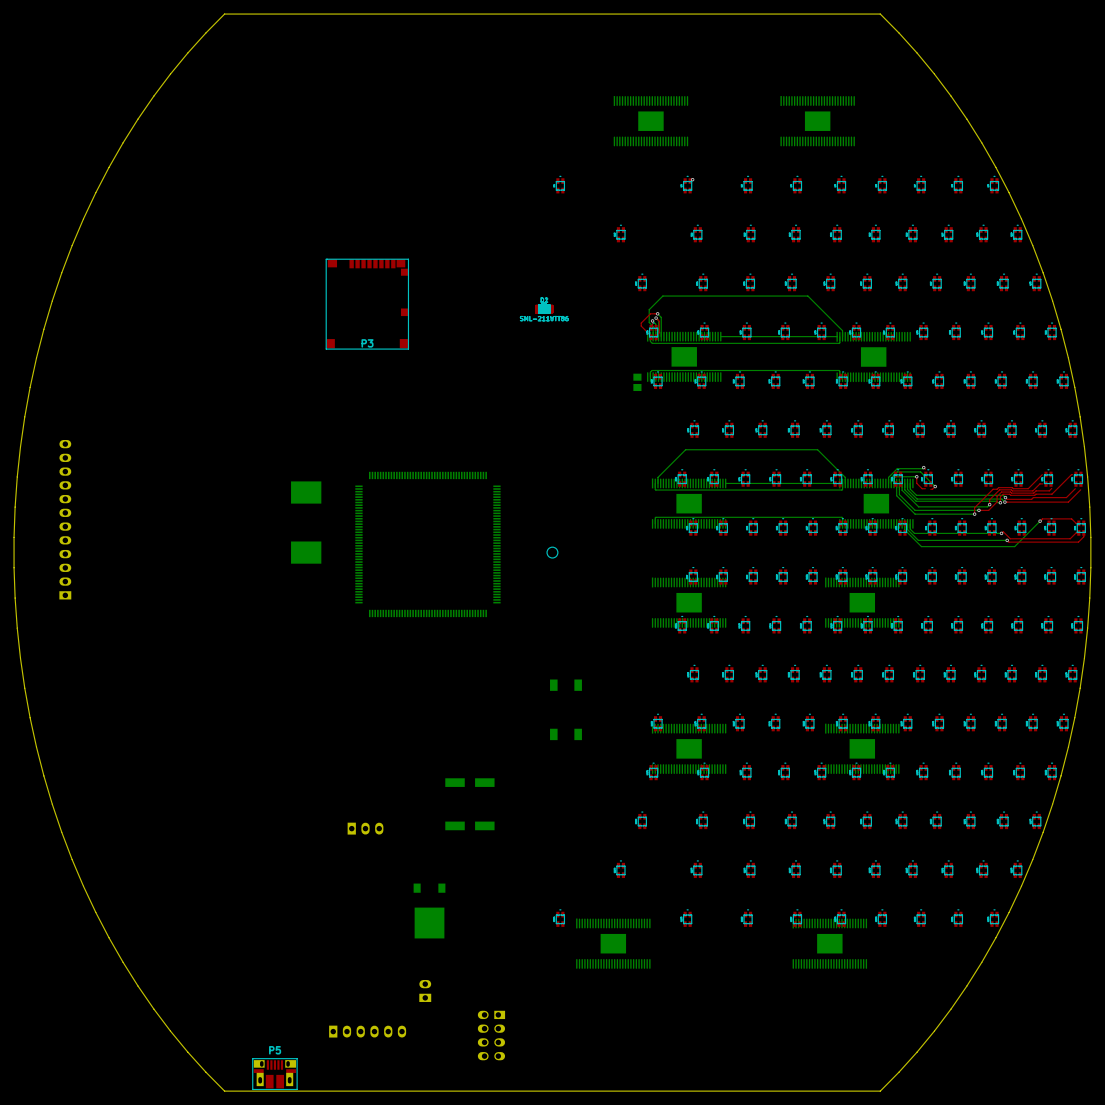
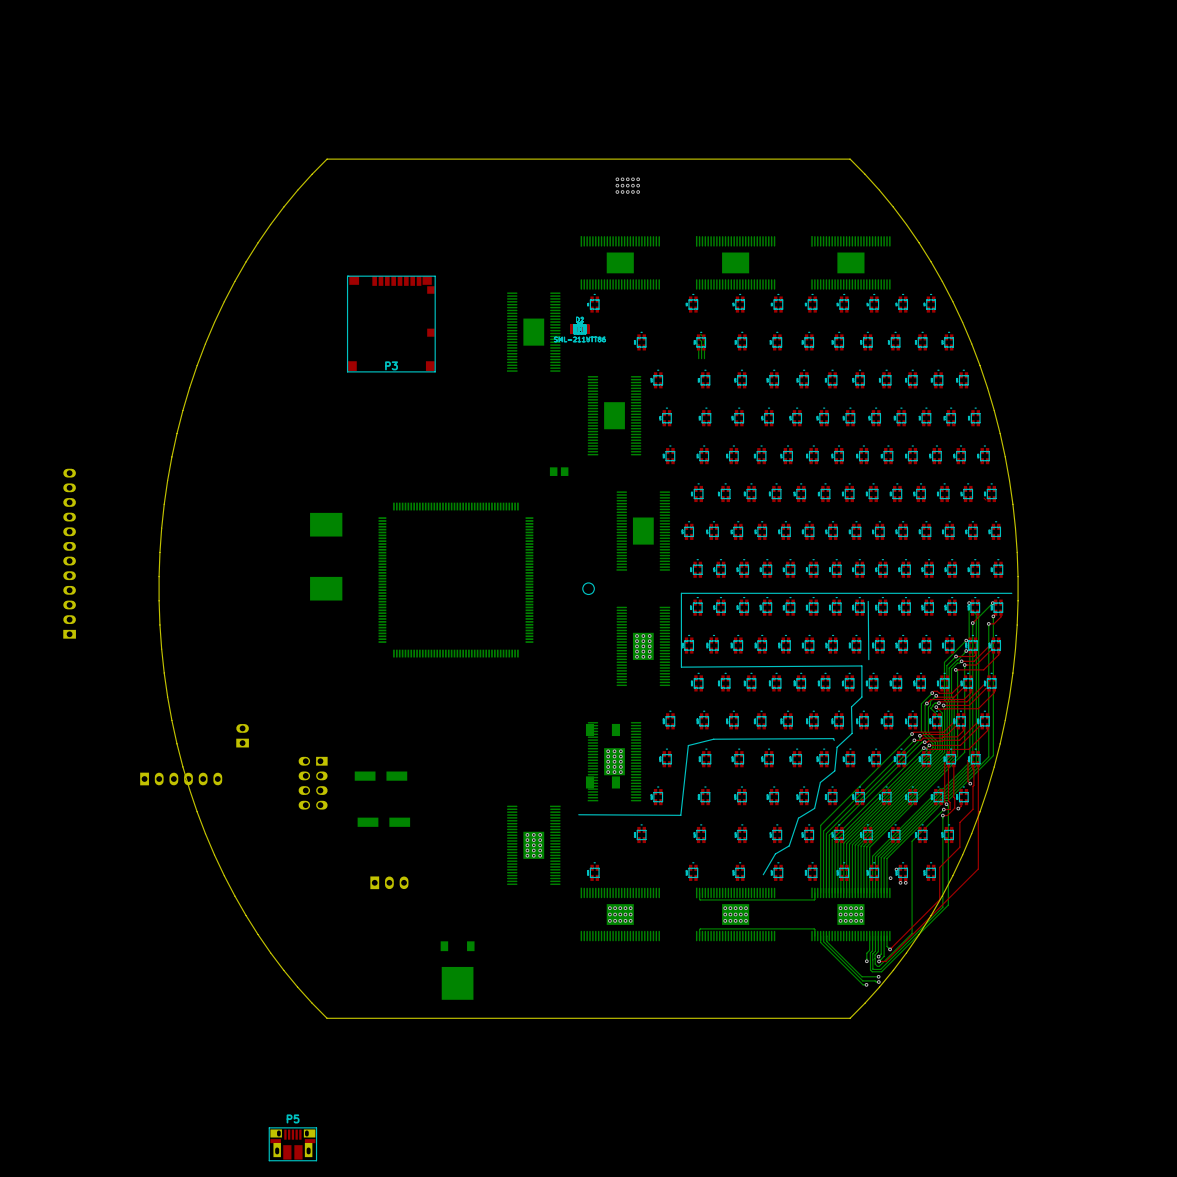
board edge: (224, 14) (187, 53) (153, 96) (109, 167) (83, 218) (61, 272) (36, 358) (24, 416) (17, 476) (14, 537) (15, 598) (20, 658) (30, 717) (43, 775) (61, 832) (95, 912) (123, 962) (170, 1031) (224, 1091) (880, 1091) (917, 1052) (951, 1009) (995, 937) (1021, 886) (1043, 832) (1068, 747) (1080, 688) (1087, 628) (1090, 567) (1089, 507) (1084, 446) (1074, 387) (1061, 329) (1043, 272) (1009, 192) (981, 142) (934, 74) (880, 14) (224, 14) -> (327, 159) (297, 190) (270, 224) (246, 261) (224, 301) (205, 343) (182, 410) (171, 456) (164, 504) (159, 552) (159, 600) (164, 673) (171, 720) (182, 766) (205, 833) (224, 875) (246, 915) (283, 970) (327, 1018) (850, 1018) (879, 987) (906, 952) (931, 915) (952, 875) (971, 833) (994, 766) (1005, 720) (1012, 673) (1017, 624) (1018, 576) (1012, 504) (1005, 456) (994, 410) (971, 343) (952, 301) (931, 261) (893, 207) (850, 159) (327, 159)
part: (650, 121) -> none
part: (817, 121) -> none
via: none -> (617, 179)
via: none -> (622, 179)
via: none -> (627, 179)
via: none -> (632, 179)
via: none -> (638, 179)
via: none -> (617, 185)
via: none -> (622, 185)
via: none -> (627, 185)
via: none -> (632, 185)
via: none -> (638, 185)
via: (692, 179) -> none
via: none -> (617, 191)
via: none -> (622, 191)
via: none -> (627, 191)
via: none -> (632, 191)
via: none -> (638, 191)
part position: (560, 184) -> (594, 303)
part position: (687, 184) -> (693, 303)
part position: (748, 184) -> (740, 303)
part position: (797, 184) -> (778, 303)
part position: (841, 184) -> (812, 303)
part position: (882, 184) -> (844, 303)
part position: (921, 184) -> (874, 303)
part position: (958, 184) -> (903, 303)
part position: (994, 184) -> (931, 303)
part position: (620, 233) -> (641, 341)
part position: (697, 233) -> (701, 341)
part position: (750, 233) -> (742, 341)
part position: (796, 233) -> (777, 341)
part position: (837, 233) -> (809, 341)
part position: (875, 233) -> (839, 341)
part position: (912, 233) -> (867, 341)
part position: (948, 233) -> (895, 341)
part position: (983, 233) -> (922, 341)
part position: (1017, 233) -> (949, 341)
part: none -> (620, 262)
part: none -> (735, 262)
part: none -> (850, 262)
part position: (642, 282) -> (658, 379)
part position: (703, 282) -> (705, 379)
part position: (750, 282) -> (741, 379)
part position: (792, 282) -> (774, 379)
part position: (830, 282) -> (804, 379)
part position: (867, 282) -> (832, 379)
part position: (902, 282) -> (859, 379)
part position: (937, 282) -> (886, 379)
part position: (970, 282) -> (912, 379)
part position: (1004, 282) -> (938, 379)
part position: (1036, 282) -> (963, 379)
part: none -> (533, 332)
top track: (657, 313) (650, 313) (641, 323) (641, 326) (651, 337) -> none
via: (657, 313) -> none
top track: (656, 318) (659, 321) (659, 332) (656, 337) -> none
via: (656, 318) -> none
top track: (652, 320) (651, 327) -> none
via: (652, 320) -> none
part position: (653, 331) -> (666, 416)
part position: (704, 331) -> (706, 416)
part position: (746, 331) -> (739, 416)
part position: (785, 331) -> (769, 416)
part position: (821, 331) -> (797, 416)
part position: (856, 331) -> (824, 416)
part position: (890, 331) -> (850, 416)
part position: (923, 331) -> (876, 416)
part position: (956, 331) -> (901, 416)
part position: (988, 331) -> (926, 416)
part position: (1020, 331) -> (951, 416)
part position: (1052, 331) -> (975, 416)
bottom track: (650, 336) (652, 343) (839, 343) (839, 336) -> none
bottom track: (653, 336) (653, 326) (649, 322) (649, 309) (662, 296) (807, 296) (842, 330) (842, 336) -> none
bottom track: (720, 336) (837, 336) -> none
part: (684, 356) -> none
part: (873, 356) -> none
bottom track: (650, 377) (652, 370) (839, 370) (839, 377) -> none
part position: (658, 380) -> (670, 454)
part position: (701, 380) -> (704, 454)
part position: (739, 380) -> (733, 454)
part position: (775, 380) -> (761, 454)
part position: (809, 380) -> (788, 454)
part position: (843, 380) -> (813, 454)
part position: (875, 380) -> (839, 454)
part position: (907, 380) -> (863, 454)
part position: (939, 380) -> (888, 454)
part position: (970, 380) -> (912, 454)
part position: (1002, 380) -> (936, 454)
part position: (1033, 380) -> (960, 454)
part position: (1063, 380) -> (984, 454)
part rotation: 0° (637, 382) -> 90° clockwise (559, 471)
part position: (637, 382) -> (559, 471)
part: none -> (614, 415)
part position: (694, 429) -> (698, 492)
part position: (729, 429) -> (725, 492)
part position: (762, 429) -> (751, 492)
part position: (795, 429) -> (776, 492)
part position: (826, 429) -> (801, 492)
part position: (858, 429) -> (825, 492)
part position: (889, 429) -> (849, 492)
part position: (920, 429) -> (873, 492)
part position: (950, 429) -> (897, 492)
part position: (981, 429) -> (921, 492)
part position: (1012, 429) -> (944, 492)
part position: (1042, 429) -> (968, 492)
part position: (1072, 429) -> (991, 492)
bottom track: (923, 467) (897, 468) (888, 477) (888, 483) -> none
via: (923, 467) -> none
top track: (1042, 474) (1028, 488) (998, 487) (993, 489) (974, 507) (974, 514) -> none
top track: (1072, 474) (1051, 494) (1003, 494) (1000, 496) (1000, 502) -> none
top track: (916, 476) (916, 483) (922, 488) (925, 488) -> none
bottom track: (916, 476) (895, 476) (893, 483) -> none
via: (916, 476) -> none
part position: (682, 478) -> (689, 530)
part position: (714, 478) -> (713, 530)
part position: (745, 478) -> (738, 530)
part position: (776, 478) -> (762, 530)
part position: (807, 478) -> (785, 530)
part position: (837, 478) -> (809, 530)
part position: (867, 478) -> (833, 530)
part position: (898, 478) -> (856, 530)
part position: (928, 478) -> (879, 530)
part position: (958, 478) -> (903, 530)
part position: (988, 478) -> (926, 530)
part position: (1018, 478) -> (949, 530)
part position: (1048, 478) -> (972, 530)
part position: (1078, 478) -> (996, 530)
bottom track: (655, 483) (655, 490) (842, 490) (842, 483) -> none
bottom track: (657, 483) (657, 477) (685, 449) (817, 449) (845, 477) (845, 483) -> none
bottom track: (725, 483) (839, 483) -> none
bottom track: (891, 483) (891, 477) (897, 471) (920, 471) (935, 486) -> none
bottom track: (896, 483) (896, 495) (915, 514) (974, 514) -> none
bottom track: (899, 483) (899, 494) (915, 510) (978, 510) -> none
bottom track: (902, 483) (902, 490) (918, 506) (987, 506) (989, 504) -> none
bottom track: (904, 483) (904, 489) (916, 501) (1000, 502) -> none
bottom track: (907, 483) (907, 489) (917, 499) (1001, 499) (1004, 502) -> none
bottom track: (910, 483) (910, 489) (916, 495) (1003, 495) (1005, 497) -> none
top track: (1042, 483) (1039, 483) (1032, 490) (999, 489) (989, 499) (989, 504) -> none
top track: (935, 486) (930, 489) -> none
via: (935, 486) -> none
top track: (1051, 488) (1049, 490) (1036, 490) (1033, 493) (1001, 492) (997, 496) (997, 501) (988, 510) (978, 510) -> none
top track: (1075, 488) (1066, 497) (1033, 497) (1031, 499) (1007, 499) (1005, 497) -> none
top track: (1080, 489) (1068, 502) (1004, 502) -> none
via: (1005, 497) -> none
part: none -> (643, 531)
via: (1000, 502) -> none
via: (1004, 502) -> none
part: (689, 503) -> none
part: (876, 503) -> none
via: (989, 504) -> none
via: (978, 510) -> none
via: (974, 514) -> none
top track: (1040, 521) (1042, 518) (1071, 518) (1078, 523) -> none
bottom track: (1040, 521) (1014, 546) (921, 546) (904, 529) (904, 523) -> none
via: (1040, 521) -> none
bottom track: (655, 523) (655, 517) (842, 517) (842, 523) -> none
bottom track: (907, 523) (907, 529) (918, 540) (1007, 540) -> none
bottom track: (910, 523) (910, 529) (914, 533) (1001, 533) -> none
part position: (693, 526) -> (697, 568)
part position: (723, 526) -> (720, 568)
part position: (753, 526) -> (744, 568)
part position: (783, 526) -> (767, 568)
part position: (813, 526) -> (790, 568)
part position: (842, 526) -> (813, 568)
part position: (872, 526) -> (836, 568)
part position: (902, 526) -> (859, 568)
part position: (932, 526) -> (882, 568)
part position: (962, 526) -> (906, 568)
part position: (991, 526) -> (929, 568)
part position: (1021, 526) -> (952, 568)
part position: (1051, 526) -> (975, 568)
part position: (1081, 526) -> (998, 568)
top track: (1078, 532) (1076, 532) (1070, 538) (1010, 538) (1003, 531) (1001, 533) -> none
top track: (1083, 532) (1083, 536) (1078, 542) (1008, 542) (1007, 540) -> none
via: (1001, 533) -> none
via: (1007, 540) -> none
line: none -> (1011, 593) (681, 593) (681, 667) (861, 665) (861, 697) (851, 706) (852, 733) (837, 747) (834, 770) (820, 782) (814, 808) (798, 818) (789, 845) (775, 853) (763, 874)
line: none -> (868, 601) (868, 659)
bottom track: none -> (969, 603) (969, 762) (943, 788) (939, 788) (872, 856) (872, 892)
via: none -> (969, 603)
bottom track: none -> (992, 603) (978, 617) (978, 763) (881, 857) (881, 892)
via: none -> (992, 603)
bottom track: none -> (972, 610) (976, 614) (976, 762) (878, 857) (878, 892)
part position: (693, 575) -> (697, 606)
part position: (723, 575) -> (720, 606)
part position: (753, 575) -> (744, 606)
part position: (783, 575) -> (767, 606)
part position: (813, 575) -> (790, 606)
part position: (842, 575) -> (813, 606)
part position: (872, 575) -> (836, 606)
part position: (902, 575) -> (859, 606)
top track: none -> (977, 612) (977, 617) (972, 623)
part position: (932, 575) -> (882, 606)
top track: none -> (1001, 612) (1001, 616) (994, 623) (988, 623)
part position: (962, 575) -> (906, 606)
part position: (991, 575) -> (929, 606)
part position: (1021, 575) -> (952, 606)
part position: (1051, 575) -> (975, 606)
part position: (1081, 575) -> (998, 606)
bottom track: none -> (993, 616) (993, 755) (886, 858) (886, 892)
via: none -> (993, 616)
bottom track: none -> (972, 623) (972, 762) (944, 791) (940, 791) (875, 856) (875, 892)
via: none -> (972, 623)
bottom track: none -> (988, 623) (988, 756) (884, 858) (884, 892)
via: none -> (988, 623)
via: none -> (637, 636)
via: none -> (643, 636)
via: none -> (649, 636)
via: none -> (637, 641)
via: none -> (643, 641)
via: none -> (649, 641)
bottom track: none -> (966, 640) (944, 662) (947, 753) (855, 845) (855, 892)
via: none -> (966, 640)
top track: none -> (993, 640) (974, 661) (961, 661)
part: (689, 602) -> none
part: (862, 602) -> none
via: none -> (637, 646)
part: none -> (643, 646)
via: none -> (643, 646)
via: none -> (649, 646)
top track: none -> (975, 650) (973, 656) (956, 656)
top track: none -> (993, 650) (990, 650) (976, 665) (964, 665)
top track: none -> (998, 650) (998, 654) (983, 669) (955, 669)
via: none -> (637, 651)
via: none -> (643, 651)
via: none -> (649, 651)
bottom track: none -> (966, 650) (949, 668) (949, 698) (951, 700) (951, 755) (861, 846) (861, 892)
via: none -> (966, 650)
via: none -> (637, 656)
via: none -> (643, 656)
via: none -> (649, 656)
bottom track: none -> (956, 656) (946, 665) (946, 699) (949, 701) (949, 754) (858, 845) (858, 892)
via: none -> (956, 656)
bottom track: none -> (961, 661) (951, 669) (951, 697) (954, 699) (954, 756) (863, 846) (863, 892)
via: none -> (961, 661)
part position: (682, 624) -> (689, 644)
part position: (714, 624) -> (713, 644)
part position: (745, 624) -> (738, 644)
part position: (776, 624) -> (762, 644)
part position: (807, 624) -> (785, 644)
part position: (837, 624) -> (809, 644)
part position: (867, 624) -> (833, 644)
part position: (898, 624) -> (856, 644)
bottom track: none -> (964, 665) (964, 752) (869, 847) (869, 892)
via: none -> (964, 665)
part position: (928, 624) -> (879, 644)
part position: (958, 624) -> (903, 644)
part position: (988, 624) -> (926, 644)
part position: (1018, 624) -> (949, 644)
part position: (1048, 624) -> (972, 644)
part position: (1078, 624) -> (996, 644)
bottom track: none -> (955, 669) (957, 671) (957, 756) (866, 846) (866, 892)
via: none -> (955, 669)
top track: none -> (965, 678) (952, 693) (939, 693) (937, 691) (932, 693)
top track: none -> (989, 678) (966, 701) (938, 703)
top track: none -> (965, 688) (962, 688) (954, 697) (936, 695)
top track: none -> (970, 688) (970, 692) (964, 699) (930, 699) (926, 703)
top track: none -> (989, 688) (986, 688) (969, 705) (943, 705)
top track: none -> (994, 688) (994, 692) (978, 708) (938, 709) (936, 707)
bottom track: none -> (932, 693) (921, 703) (921, 731) (932, 743) (932, 747) (837, 842) (837, 892)
via: none -> (932, 693)
bottom track: none -> (936, 695) (930, 701) (928, 707) (928, 732) (937, 741) (937, 749) (843, 843) (843, 892)
via: none -> (936, 695)
bottom track: none -> (938, 703) (935, 703) (930, 708) (939, 717) (939, 750) (846, 843) (846, 892)
via: none -> (938, 703)
bottom track: none -> (926, 703) (925, 705) (925, 731) (935, 742) (935, 748) (840, 842) (840, 892)
via: none -> (926, 703)
bottom track: none -> (943, 705) (944, 738)
via: none -> (943, 705)
bottom track: none -> (936, 707) (942, 713) (942, 751) (849, 844) (849, 892)
via: none -> (936, 707)
top track: none -> (958, 716) (943, 732) (913, 732) (912, 734)
top track: none -> (982, 716) (959, 740) (924, 742)
part position: (694, 673) -> (698, 682)
part position: (729, 673) -> (725, 682)
part position: (762, 673) -> (751, 682)
part position: (795, 673) -> (776, 682)
part position: (826, 673) -> (801, 682)
part position: (858, 673) -> (825, 682)
part position: (889, 673) -> (849, 682)
part position: (920, 673) -> (873, 682)
part position: (950, 673) -> (897, 682)
part position: (981, 673) -> (921, 682)
part position: (1012, 673) -> (944, 682)
part position: (1042, 673) -> (968, 682)
part position: (1072, 673) -> (991, 682)
top track: none -> (958, 726) (955, 726) (947, 734) (919, 735)
top track: none -> (963, 726) (963, 730) (957, 736) (923, 738) (920, 740) (914, 740)
top track: none -> (982, 726) (979, 726) (960, 745) (929, 745)
top track: none -> (987, 726) (987, 730) (968, 749) (923, 748)
bottom track: none -> (912, 734) (820, 825) (820, 892)
via: none -> (912, 734)
part: none -> (242, 735)
bottom track: none -> (919, 735) (919, 740) (826, 833) (826, 892)
via: none -> (919, 735)
bottom track: none -> (944, 738) (944, 752) (852, 844) (852, 892)
line: none -> (834, 740) (833, 738) (713, 739) (688, 745) (680, 815) (578, 814)
bottom track: none -> (914, 740) (823, 831) (823, 892)
via: none -> (914, 740)
bottom track: none -> (924, 742) (922, 742) (829, 835) (829, 892)
via: none -> (924, 742)
bottom track: none -> (929, 745) (927, 749) (835, 841) (835, 892)
via: none -> (929, 745)
bottom track: none -> (923, 748) (832, 839) (832, 892)
via: none -> (923, 748)
via: none -> (608, 751)
via: none -> (614, 751)
via: none -> (620, 751)
top track: none -> (948, 754) (944, 759) (944, 802) (946, 804)
top track: none -> (973, 754) (967, 760) (967, 781) (970, 783)
via: none -> (608, 756)
via: none -> (614, 756)
via: none -> (620, 756)
via: none -> (608, 761)
part: none -> (614, 761)
via: none -> (614, 761)
via: none -> (620, 761)
top track: none -> (948, 764) (950, 809) (943, 809)
top track: none -> (953, 764) (954, 808) (947, 815) (942, 815)
top track: none -> (973, 764) (973, 809) (959, 822) (959, 847) (939, 867) (939, 899) (890, 949)
top track: none -> (978, 764) (978, 868) (885, 961) (879, 961)
via: none -> (608, 766)
via: none -> (614, 766)
via: none -> (620, 766)
part position: (658, 722) -> (670, 720)
part position: (701, 722) -> (704, 720)
part position: (739, 722) -> (733, 720)
part position: (775, 722) -> (761, 720)
part position: (809, 722) -> (788, 720)
part position: (843, 722) -> (813, 720)
part position: (875, 722) -> (839, 720)
part position: (907, 722) -> (863, 720)
part position: (939, 722) -> (888, 720)
part position: (970, 722) -> (912, 720)
part position: (1002, 722) -> (936, 720)
part position: (1033, 722) -> (960, 720)
part position: (1063, 722) -> (984, 720)
via: none -> (608, 772)
via: none -> (614, 772)
via: none -> (620, 772)
part: none -> (380, 776)
part: none -> (181, 779)
part: none -> (313, 783)
via: none -> (970, 783)
part: (689, 748) -> none
part: (862, 748) -> none
top track: none -> (961, 802) (961, 806) (958, 808)
bottom track: none -> (946, 804) (948, 806) (948, 905) (881, 971) (872, 971) (870, 969) (872, 936)
via: none -> (946, 804)
via: none -> (958, 808)
bottom track: none -> (943, 809) (912, 841) (912, 933) (879, 966) (875, 964) (875, 958) (875, 954) (878, 951) (878, 936)
via: none -> (943, 809)
bottom track: none -> (942, 815) (942, 907) (880, 969) (872, 968) (875, 936)
via: none -> (942, 815)
part: none -> (383, 822)
part position: (653, 771) -> (666, 757)
part position: (704, 771) -> (706, 757)
part position: (746, 771) -> (739, 757)
part position: (785, 771) -> (769, 757)
part position: (821, 771) -> (797, 757)
part position: (856, 771) -> (824, 757)
part position: (890, 771) -> (850, 757)
part position: (923, 771) -> (876, 757)
part position: (956, 771) -> (901, 757)
part position: (988, 771) -> (926, 757)
part position: (1020, 771) -> (951, 757)
part position: (1052, 771) -> (975, 757)
part: (469, 782) -> none
via: none -> (527, 834)
via: none -> (533, 834)
via: none -> (540, 834)
via: none -> (527, 840)
via: none -> (533, 840)
via: none -> (540, 840)
via: none -> (527, 845)
part: none -> (533, 845)
via: none -> (533, 845)
via: none -> (540, 845)
via: none -> (527, 850)
via: none -> (533, 850)
via: none -> (540, 850)
via: none -> (527, 855)
via: none -> (533, 855)
via: none -> (540, 855)
via: none -> (896, 869)
part position: (642, 820) -> (658, 795)
part position: (703, 820) -> (705, 795)
part position: (750, 820) -> (741, 795)
part position: (792, 820) -> (774, 795)
part position: (830, 820) -> (804, 795)
part position: (867, 820) -> (832, 795)
part position: (902, 820) -> (859, 795)
part position: (937, 820) -> (886, 795)
part position: (970, 820) -> (912, 795)
part position: (1004, 820) -> (938, 795)
part position: (1036, 820) -> (963, 795)
via: none -> (890, 878)
part: (469, 825) -> none
via: none -> (900, 882)
via: none -> (905, 882)
bottom track: none -> (699, 892) (700, 899) (814, 899) (814, 892)
via: none -> (609, 908)
via: none -> (615, 908)
via: none -> (620, 908)
via: none -> (625, 908)
via: none -> (630, 908)
via: none -> (725, 908)
via: none -> (730, 908)
via: none -> (735, 908)
via: none -> (740, 908)
via: none -> (745, 908)
via: none -> (840, 908)
via: none -> (845, 908)
via: none -> (850, 908)
via: none -> (856, 908)
via: none -> (861, 908)
via: none -> (609, 914)
via: none -> (615, 914)
part: none -> (620, 914)
via: none -> (620, 914)
via: none -> (625, 914)
via: none -> (630, 914)
via: none -> (725, 914)
via: none -> (730, 914)
part: none -> (735, 914)
via: none -> (735, 914)
via: none -> (740, 914)
via: none -> (745, 914)
via: none -> (840, 914)
via: none -> (845, 914)
part: none -> (850, 914)
via: none -> (850, 914)
via: none -> (856, 914)
via: none -> (861, 914)
via: none -> (609, 920)
via: none -> (615, 920)
via: none -> (620, 920)
via: none -> (625, 920)
via: none -> (630, 920)
via: none -> (725, 920)
via: none -> (730, 920)
via: none -> (735, 920)
via: none -> (740, 920)
via: none -> (745, 920)
via: none -> (840, 920)
via: none -> (845, 920)
via: none -> (850, 920)
via: none -> (856, 920)
via: none -> (861, 920)
part position: (620, 869) -> (641, 833)
part position: (697, 869) -> (701, 833)
part position: (750, 869) -> (742, 833)
part position: (796, 869) -> (777, 833)
part position: (837, 869) -> (809, 833)
part position: (875, 869) -> (839, 833)
part position: (912, 869) -> (867, 833)
part position: (948, 869) -> (895, 833)
part position: (983, 869) -> (922, 833)
part position: (1017, 869) -> (949, 833)
bottom track: none -> (699, 936) (700, 928) (814, 928) (814, 936)
bottom track: none -> (820, 936) (820, 942) (863, 984) (866, 984)
bottom track: none -> (823, 936) (823, 941) (862, 980) (878, 982)
bottom track: none -> (826, 936) (826, 941) (861, 976) (878, 976)
bottom track: none -> (869, 936) (869, 950) (866, 953) (866, 961)
bottom track: none -> (881, 936) (881, 954) (878, 956)
bottom track: none -> (884, 936) (884, 956) (879, 961)
bottom track: none -> (886, 936) (886, 946) (890, 949)
via: none -> (890, 949)
via: none -> (878, 956)
via: none -> (866, 961)
via: none -> (879, 961)
via: none -> (878, 976)
part position: (560, 918) -> (594, 871)
part position: (687, 918) -> (693, 871)
part position: (748, 918) -> (740, 871)
part position: (797, 918) -> (778, 871)
part position: (841, 918) -> (812, 871)
part position: (882, 918) -> (844, 871)
part position: (921, 918) -> (874, 871)
part position: (958, 918) -> (903, 871)
part position: (994, 918) -> (931, 871)
via: none -> (878, 982)
via: none -> (866, 984)
part: (613, 943) -> none
part: (829, 943) -> none
part: (425, 990) -> none
part: (367, 1031) -> none
part: (491, 1035) -> none

